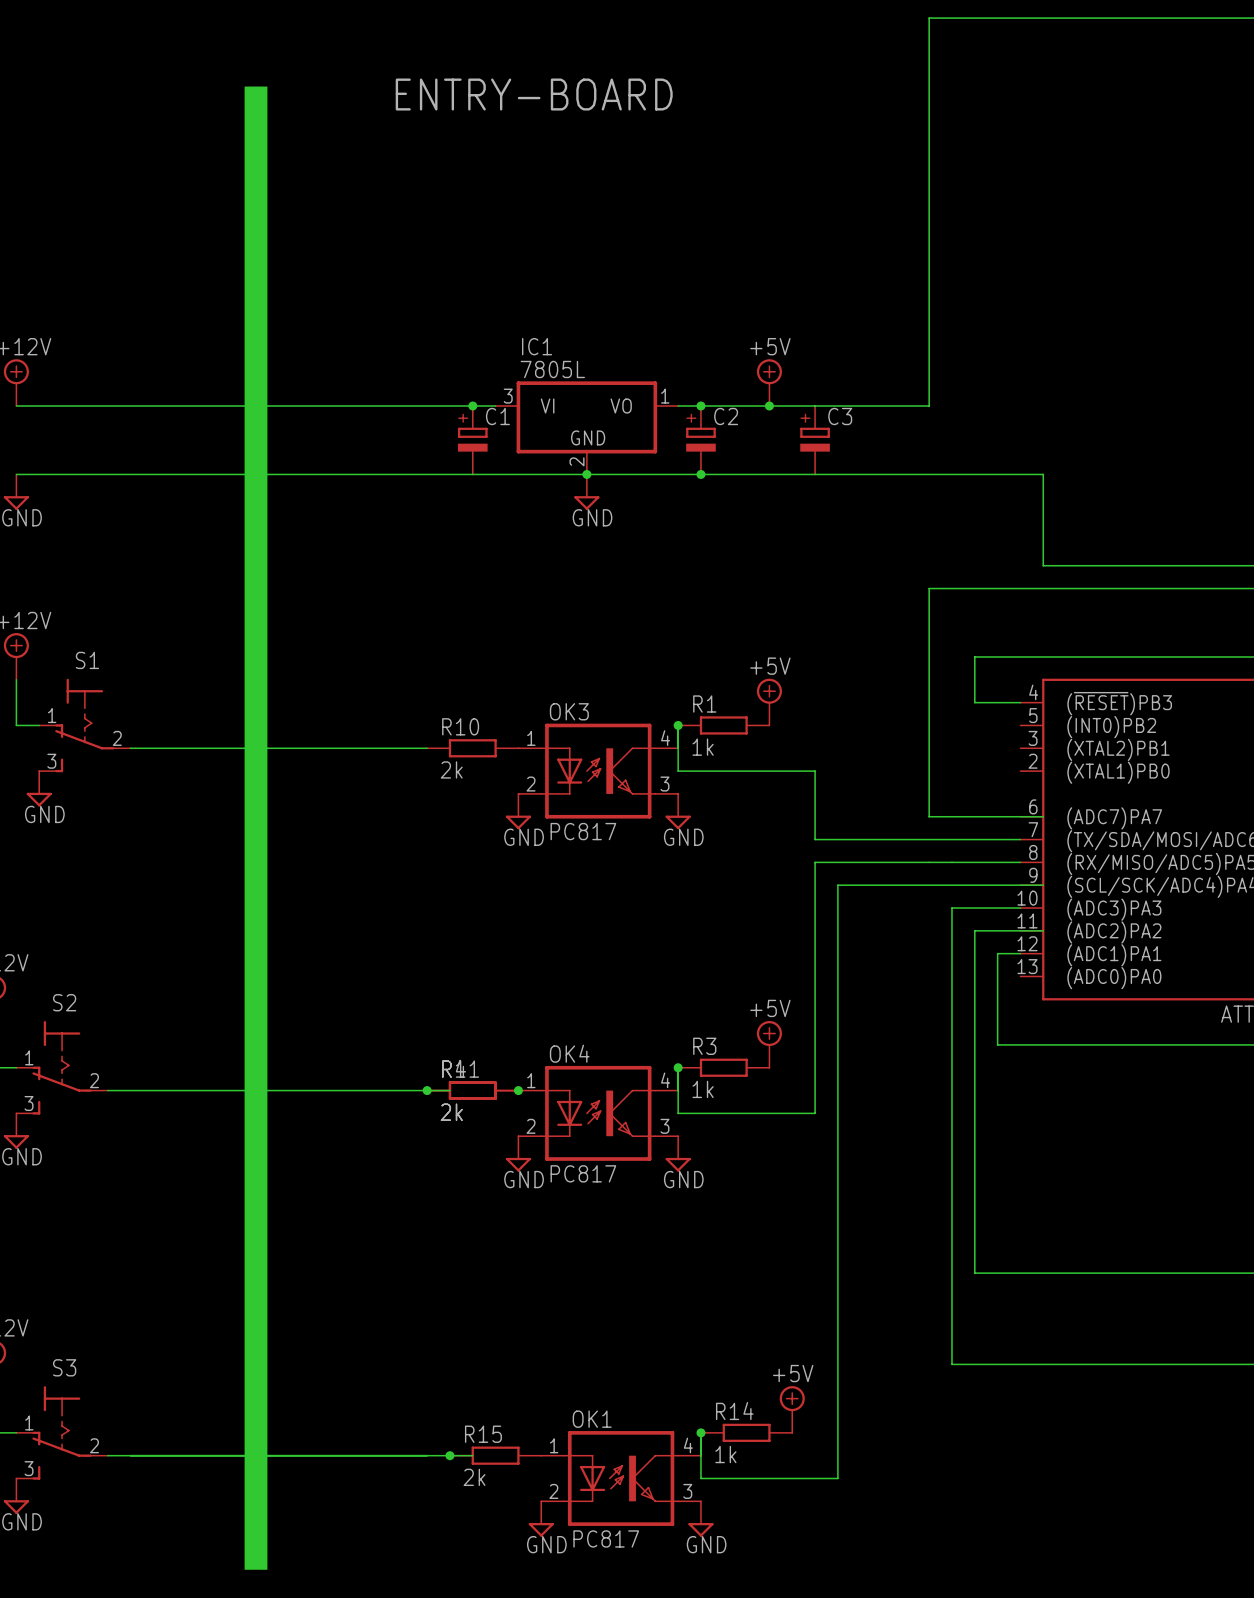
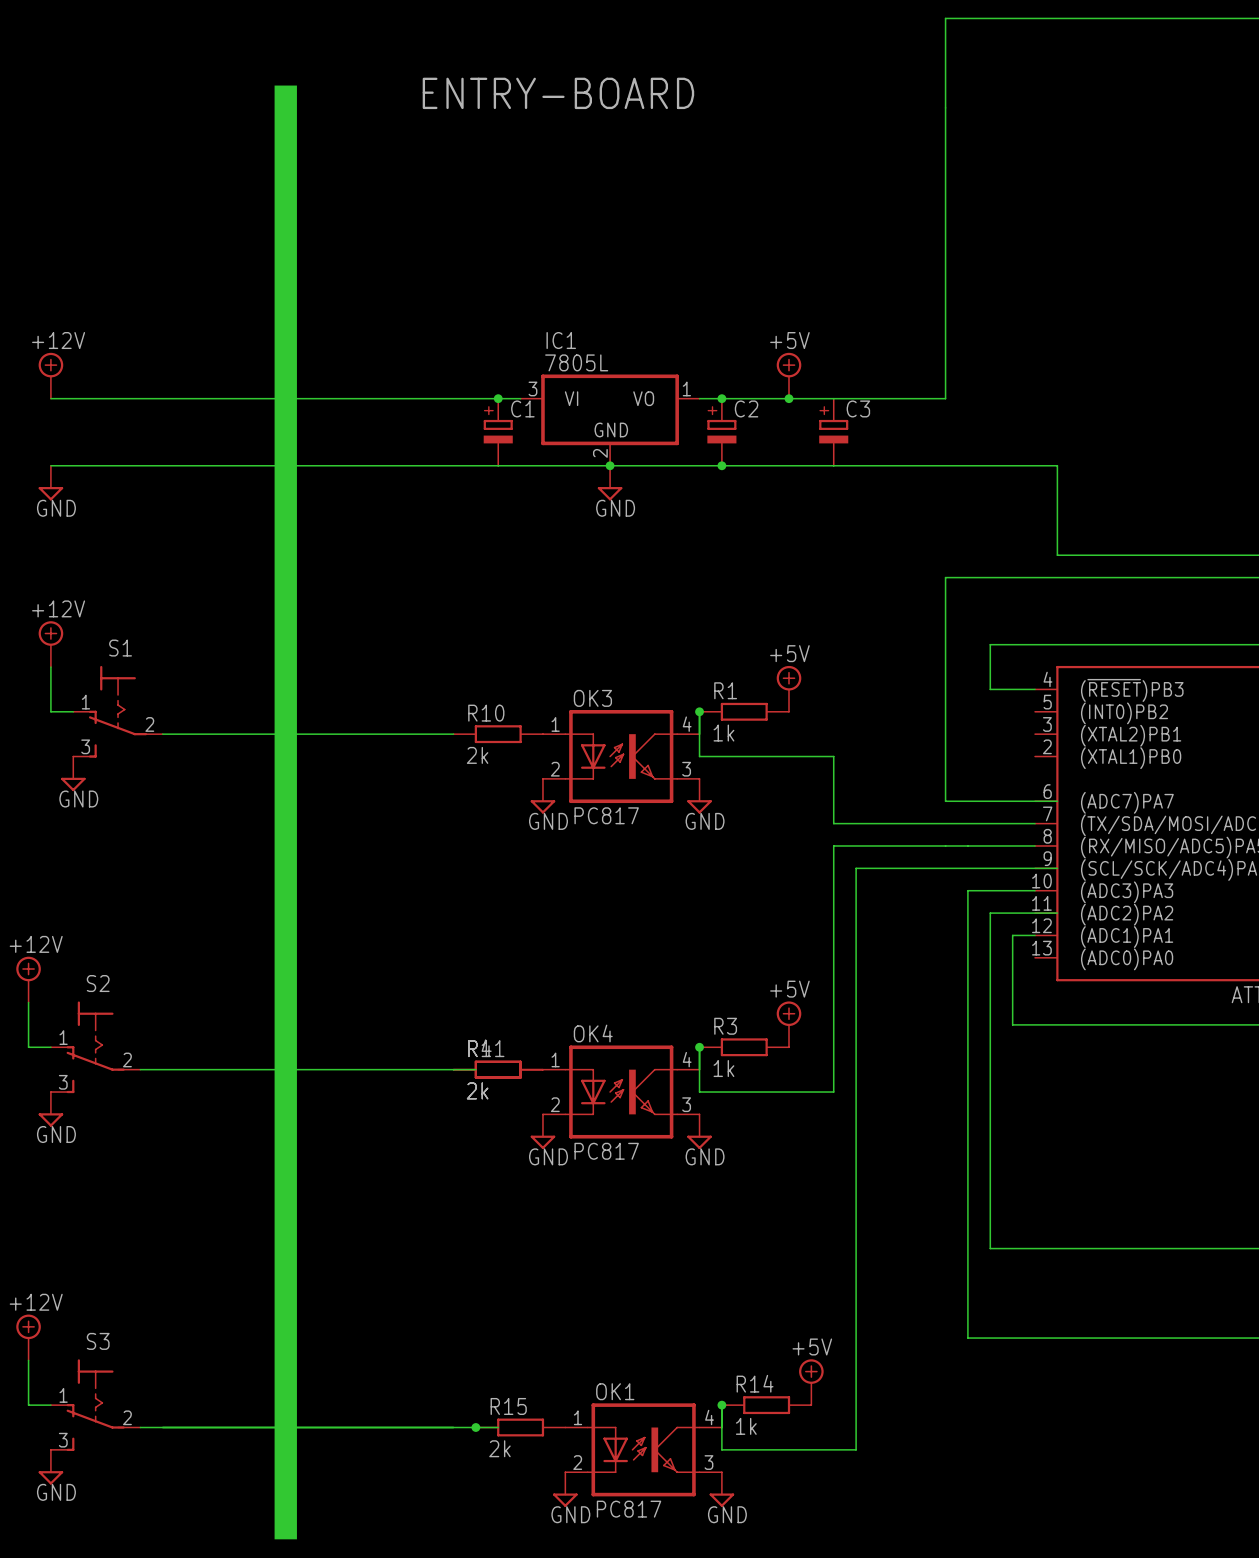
junction: (427, 1090) -> none
junction: (518, 1090) -> none

